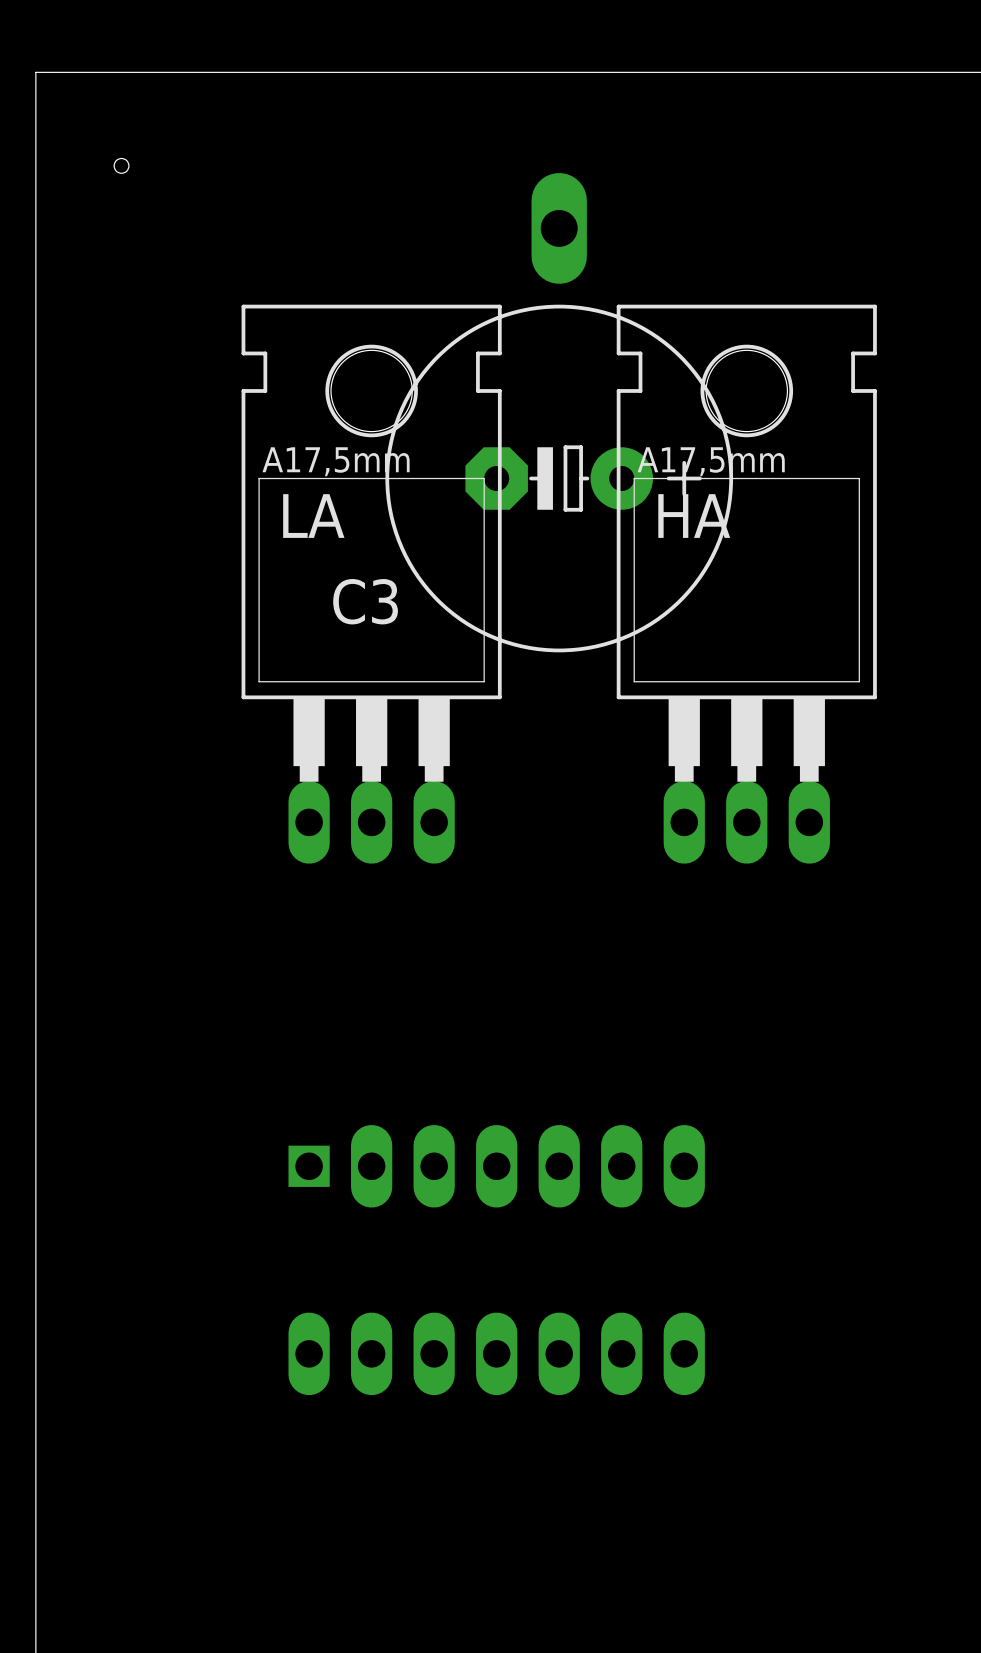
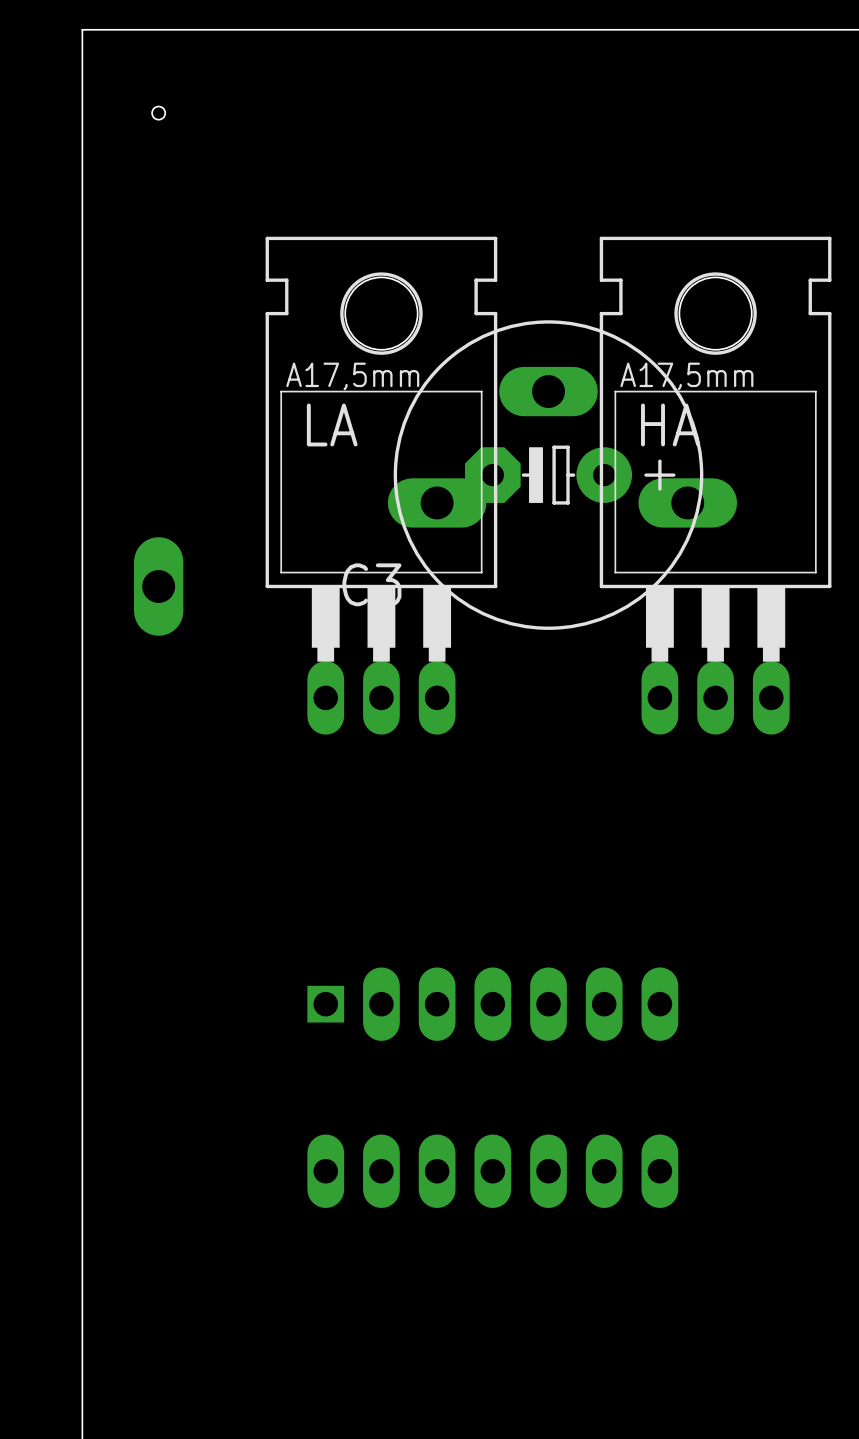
part: (559, 228) -> none
C3 position: (559, 478) -> (548, 475)
part: none -> (548, 391)
part: none -> (437, 502)
part: none -> (687, 502)
part: none -> (158, 586)

